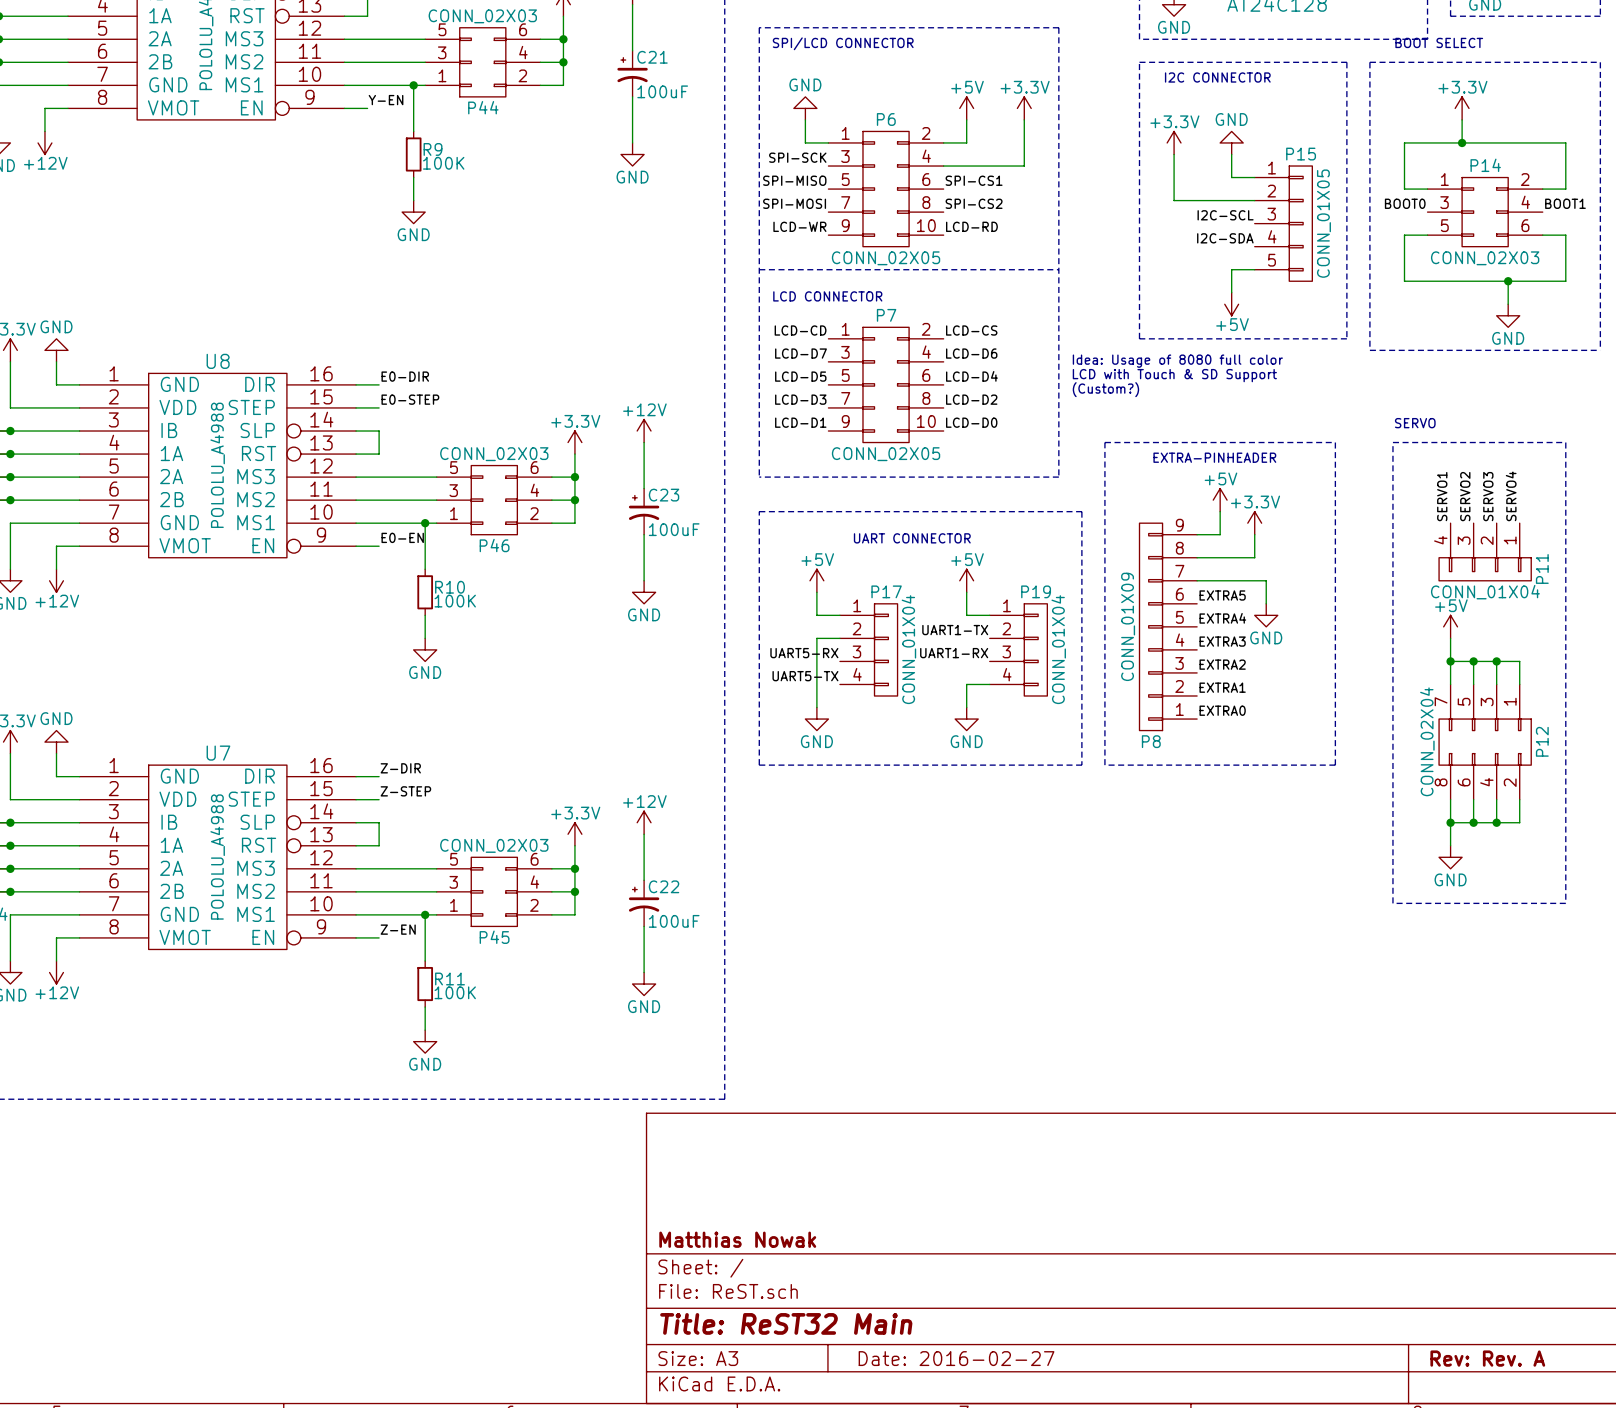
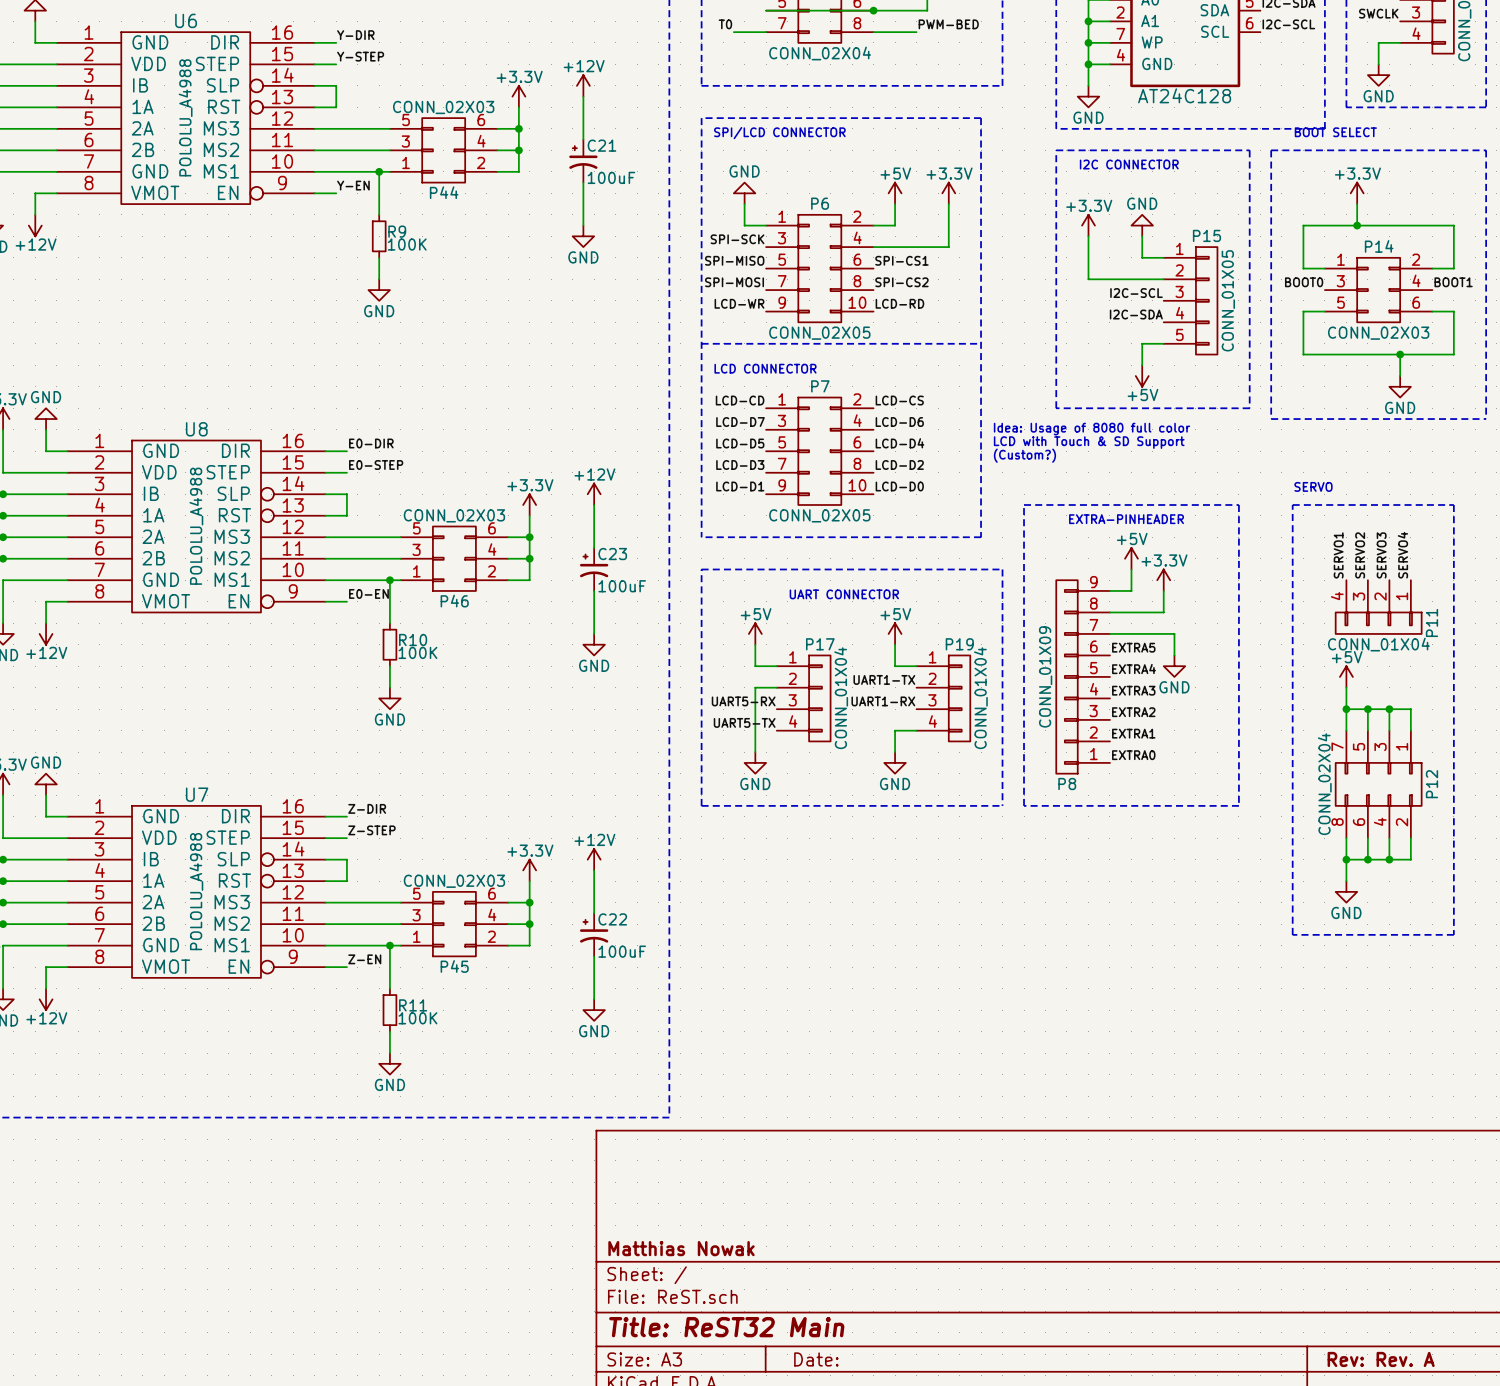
title block: Date: 2016-02-27 (956, 1358) -> Date: (816, 1359)

